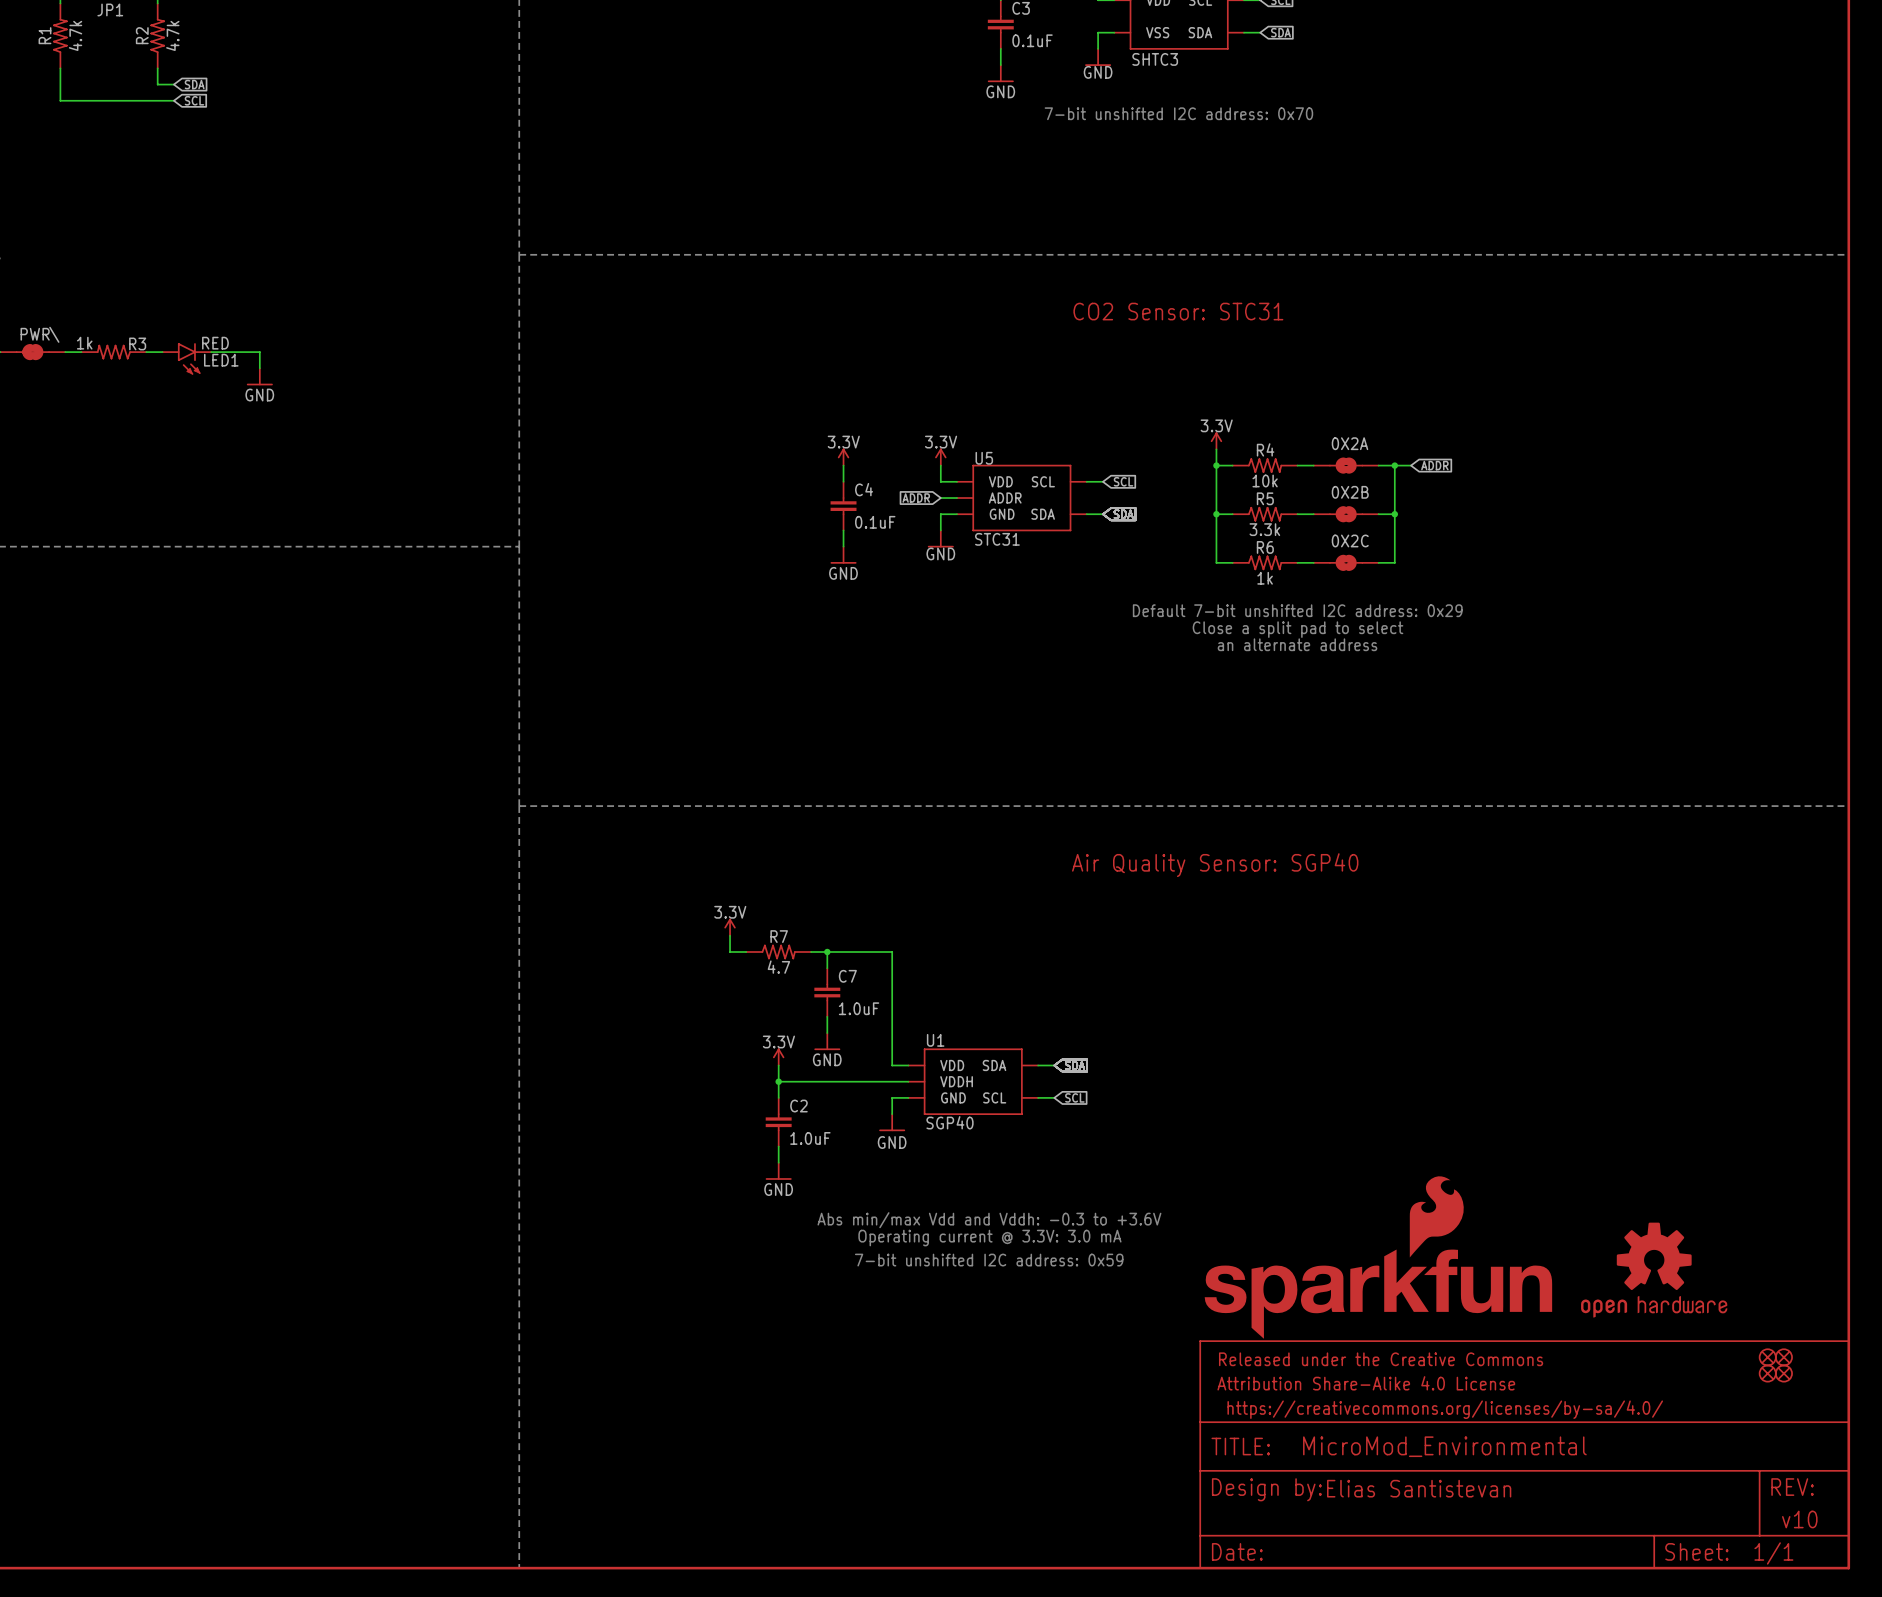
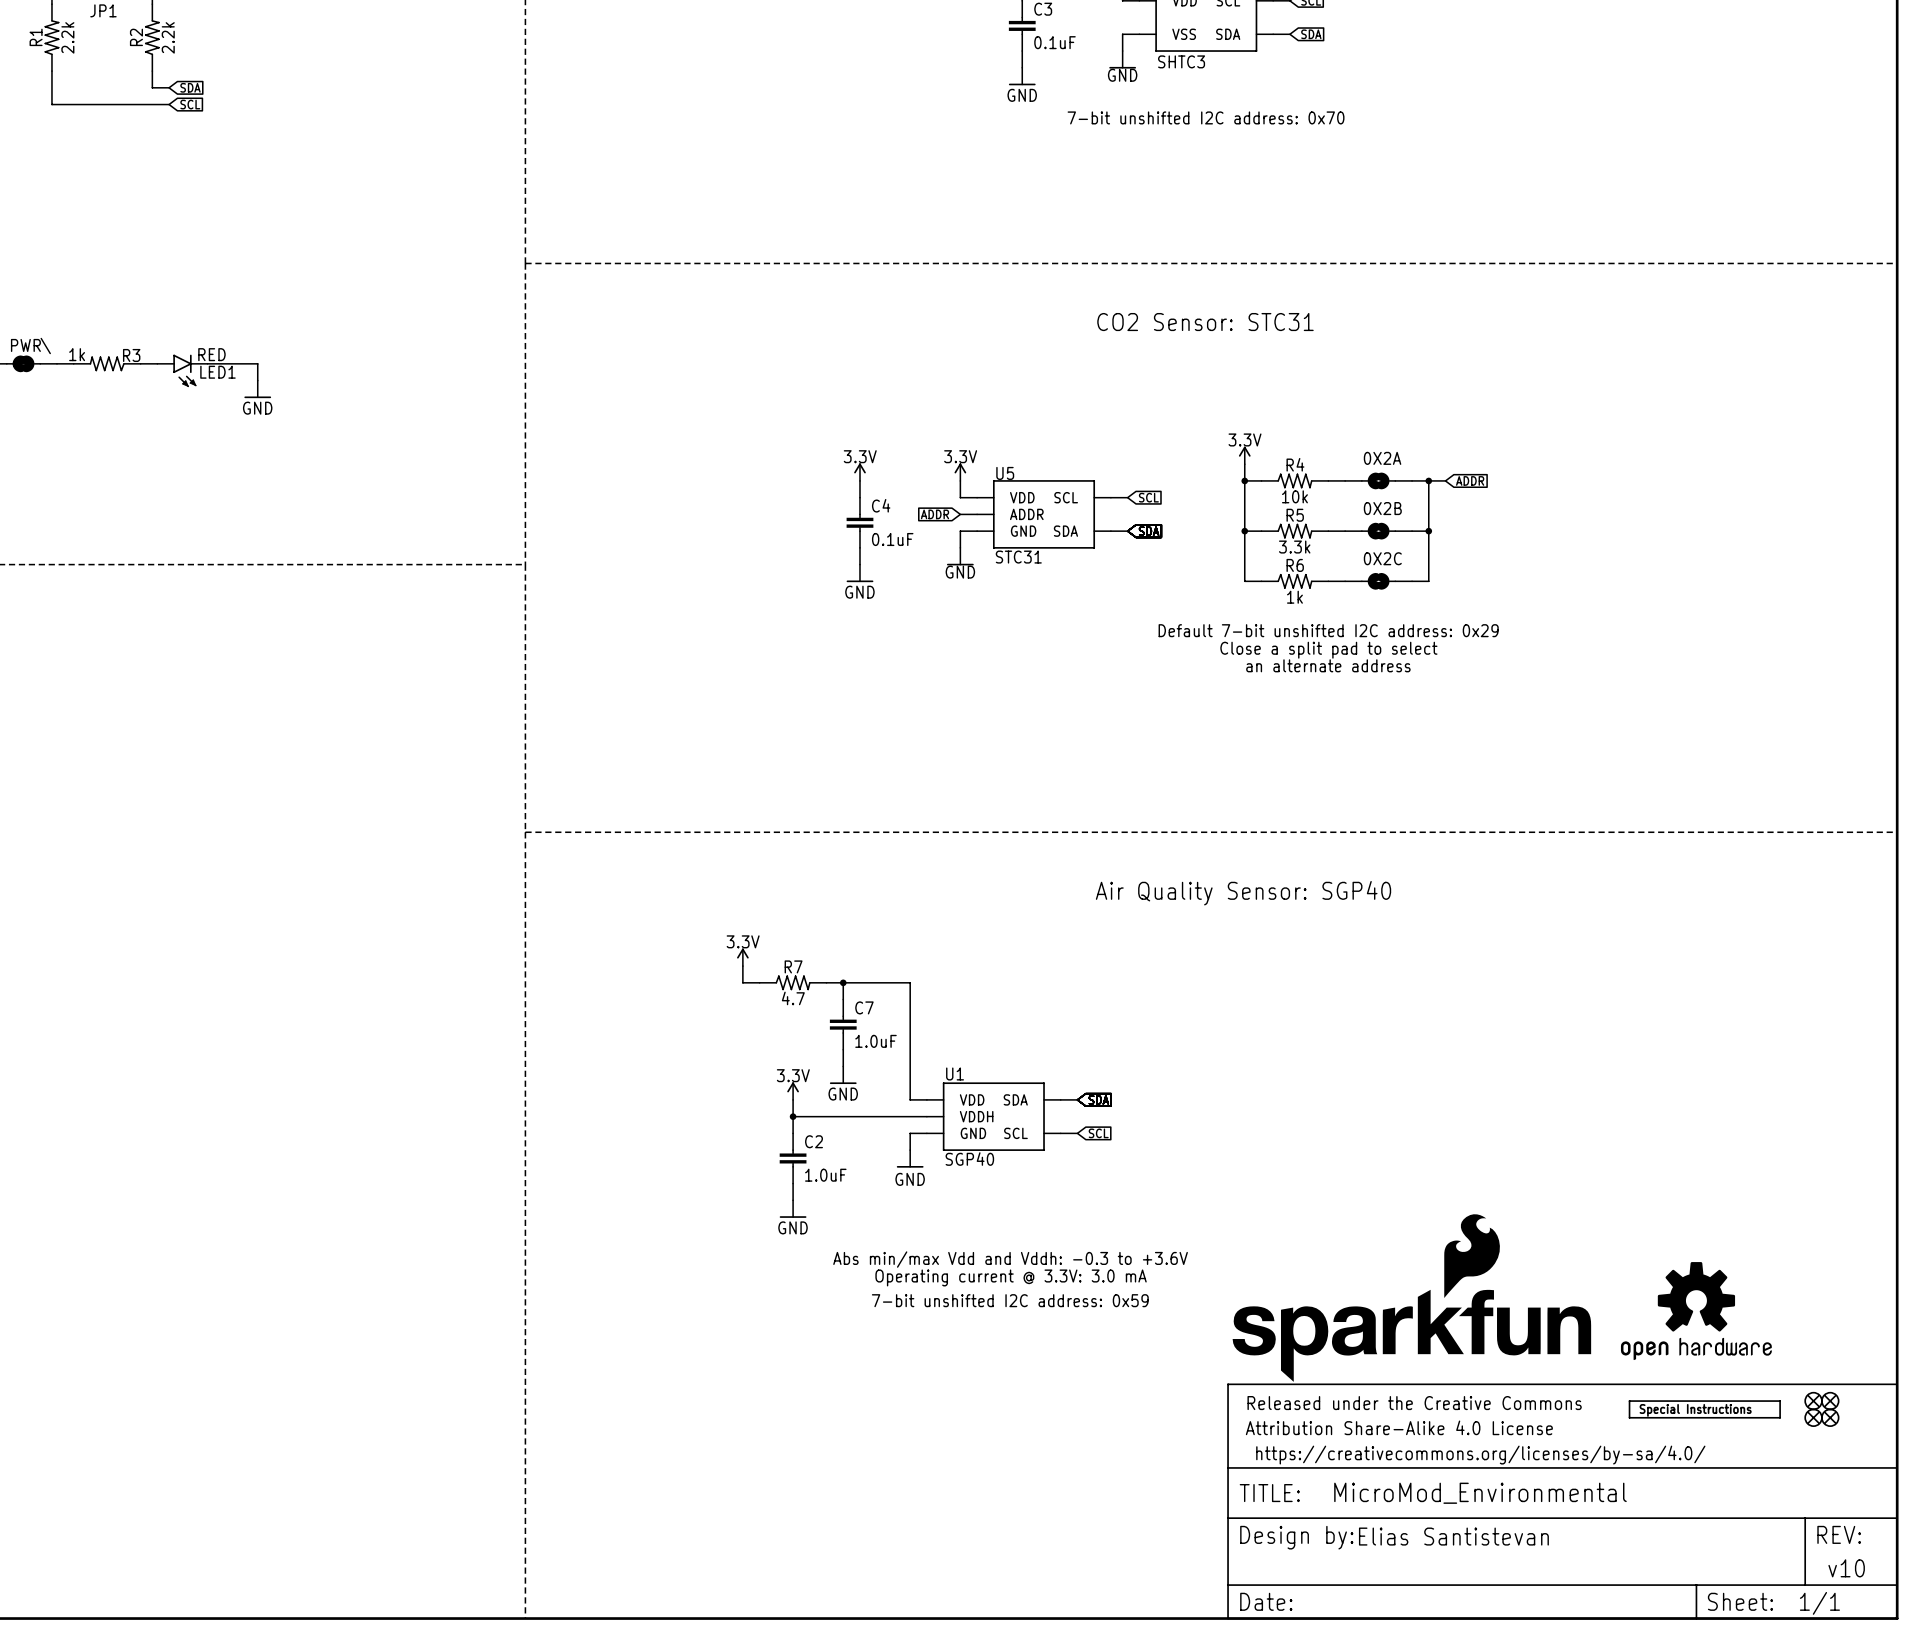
R1 value: 4.7k (75, 35) -> 2.2k (67, 37)
R2 value: 4.7k (172, 35) -> 2.2k (168, 37)
part: none -> (1704, 1409)

